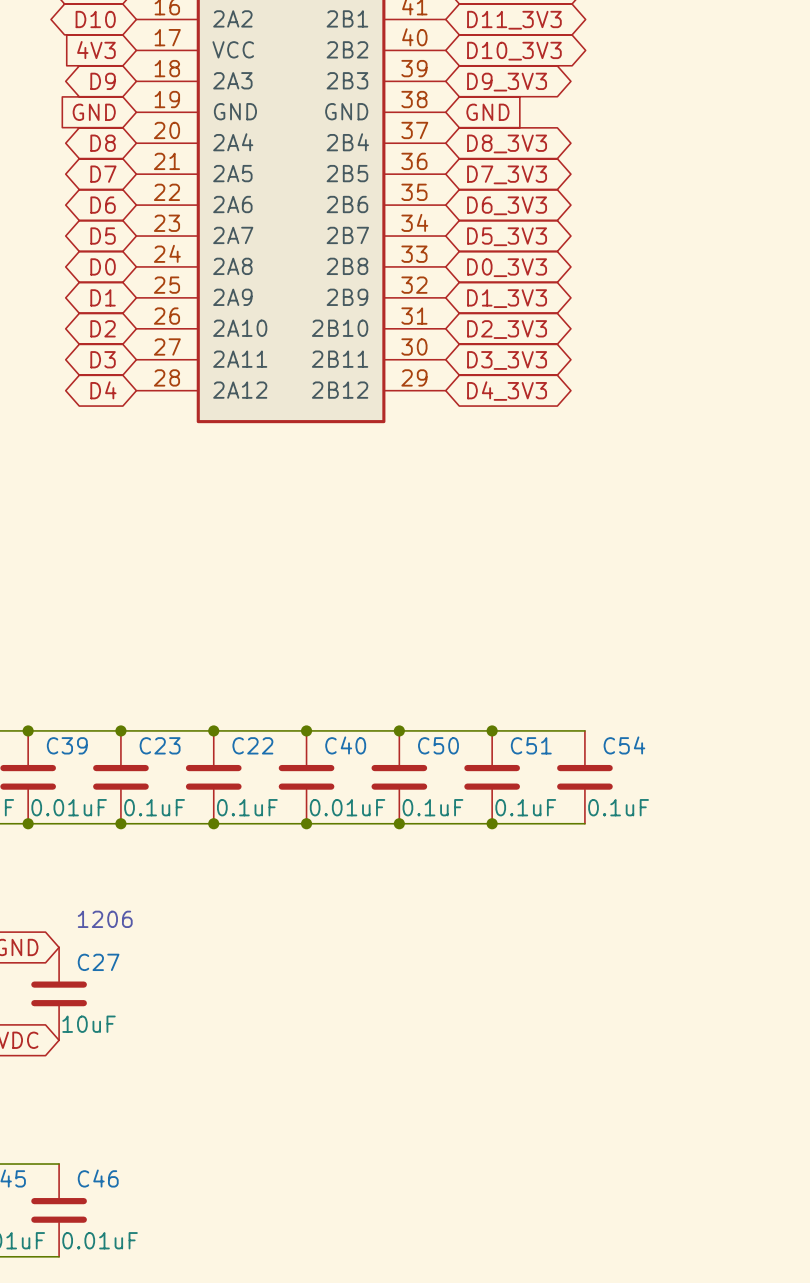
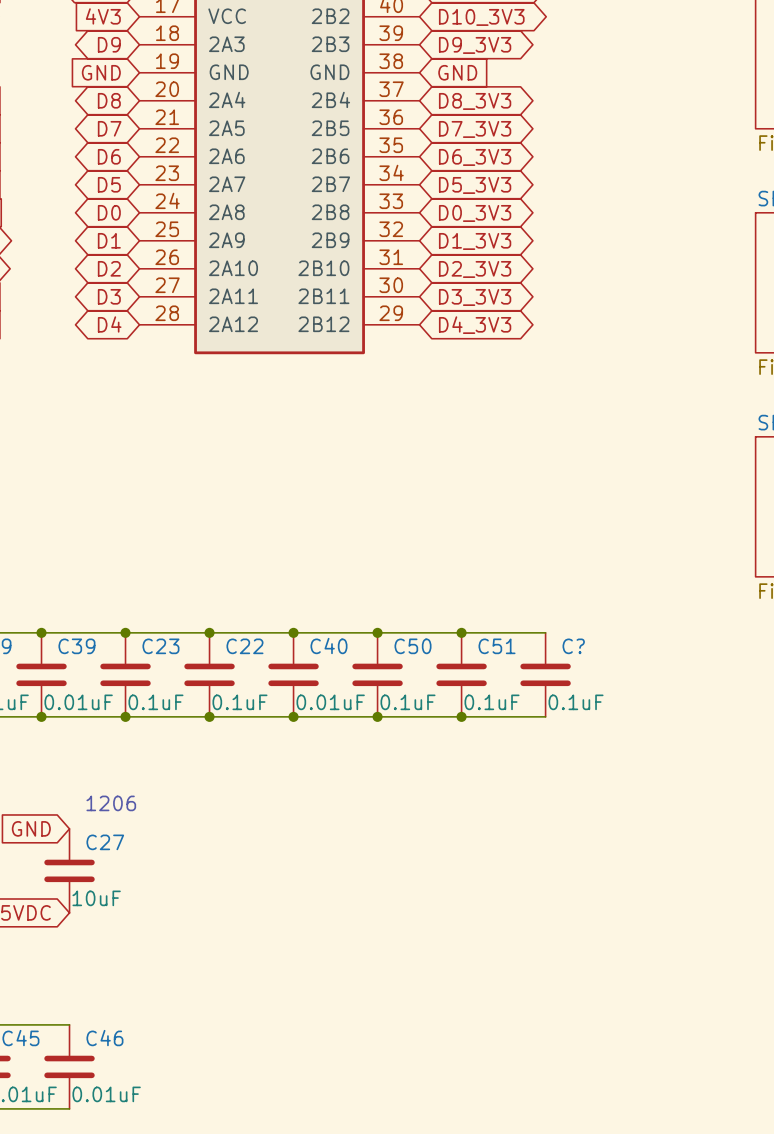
C54 name: C54 (624, 745) -> C? (573, 646)

